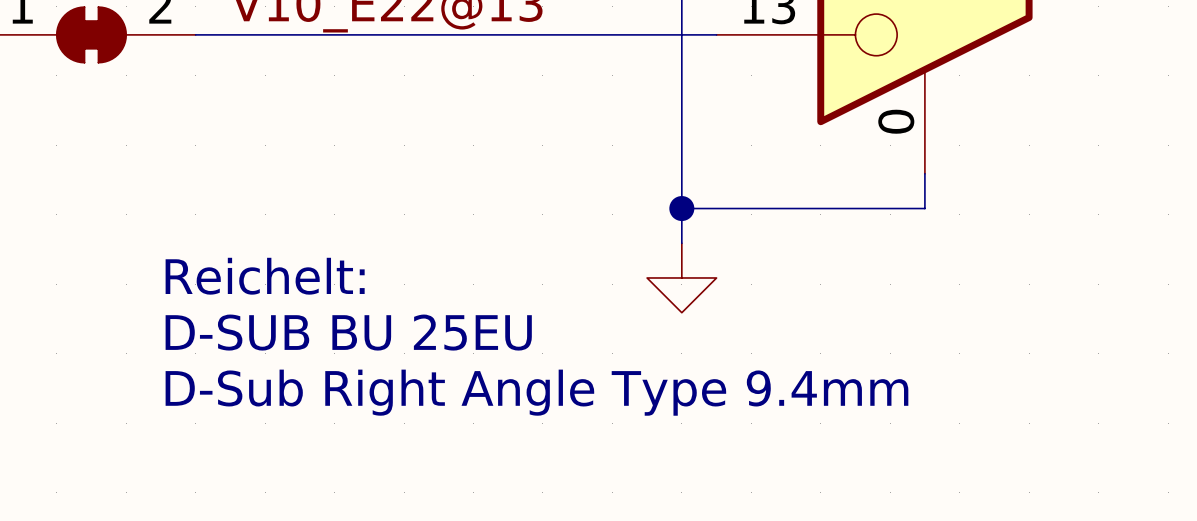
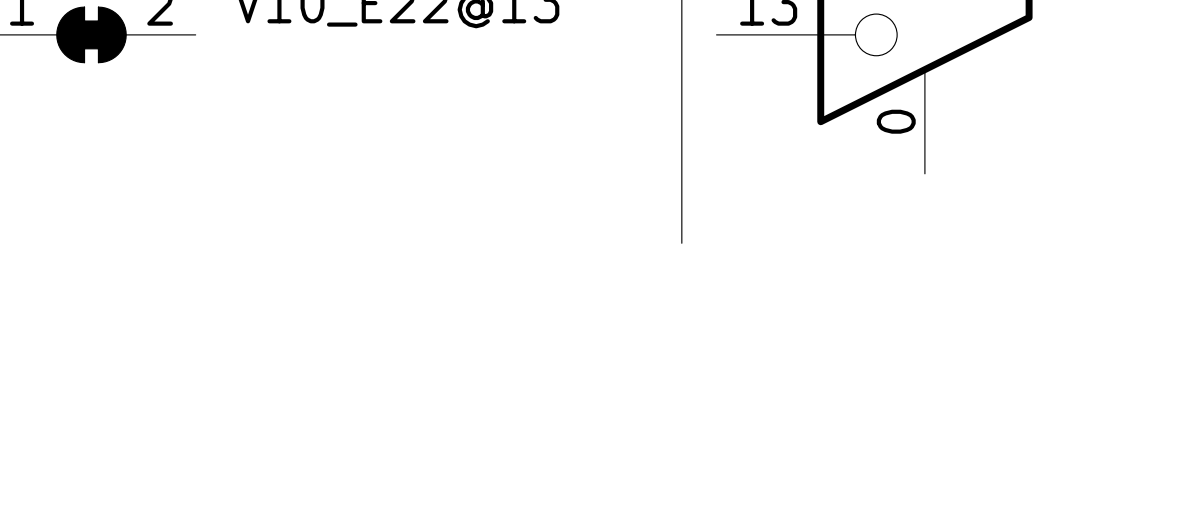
wire: (195, 34) (716, 34) -> none
wire: (924, 173) (924, 208) (681, 208) -> none
junction: (681, 208) -> none
text: Reichelt: (265, 276) -> none
power symbol: (681, 277) -> none
text: D-SUB BU 25EU (348, 332) -> none
text: D-Sub Right Angle Type 9.4mm (536, 392) -> none

